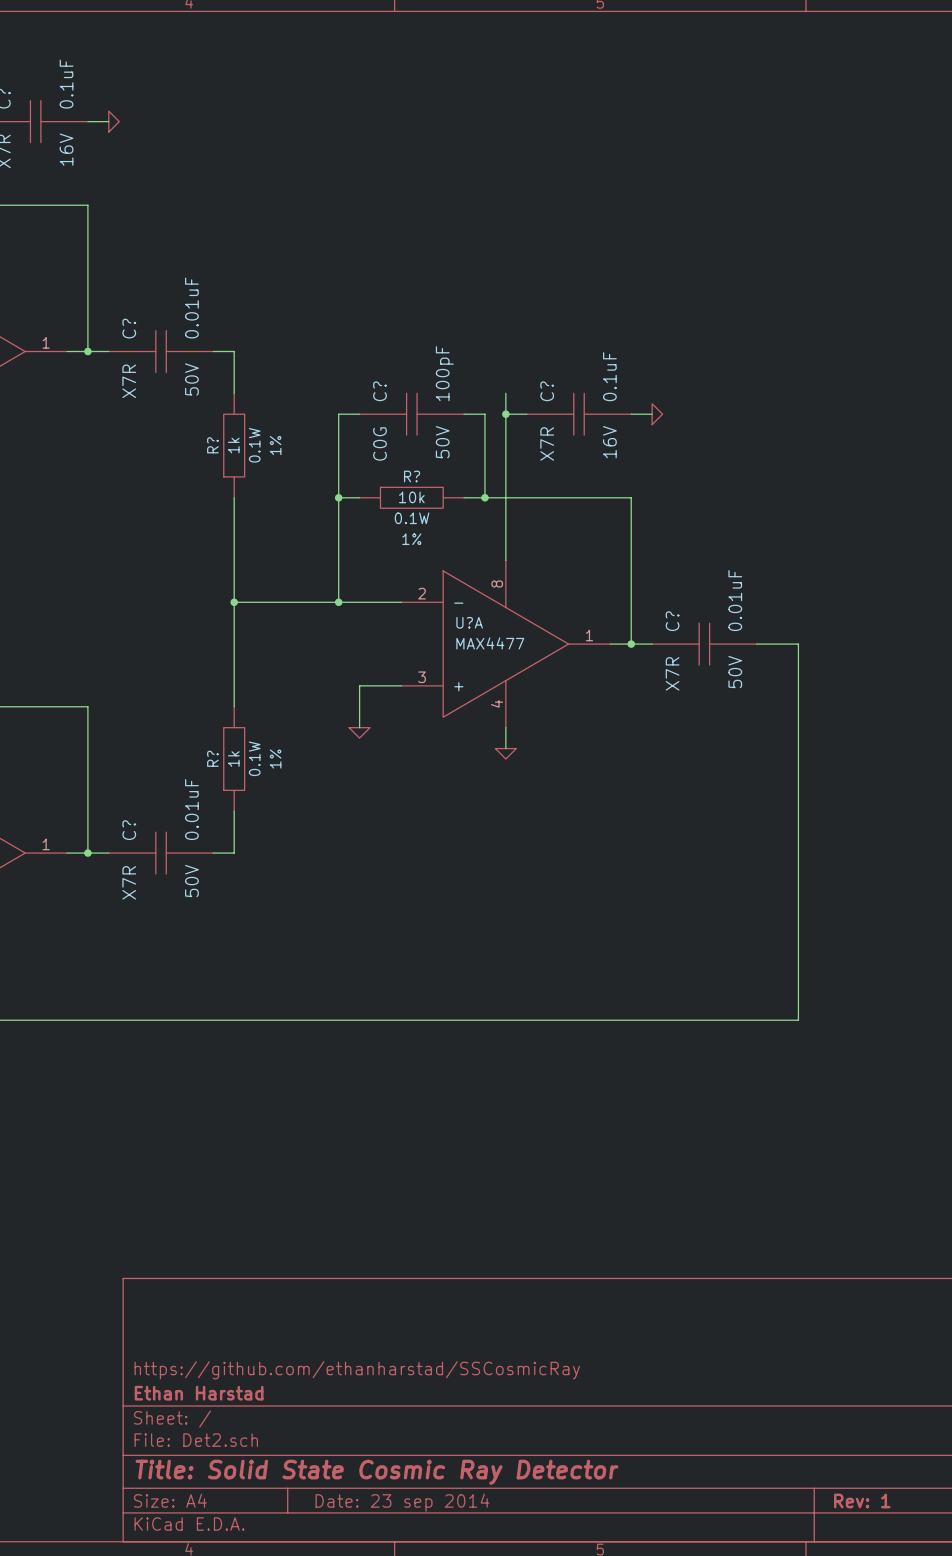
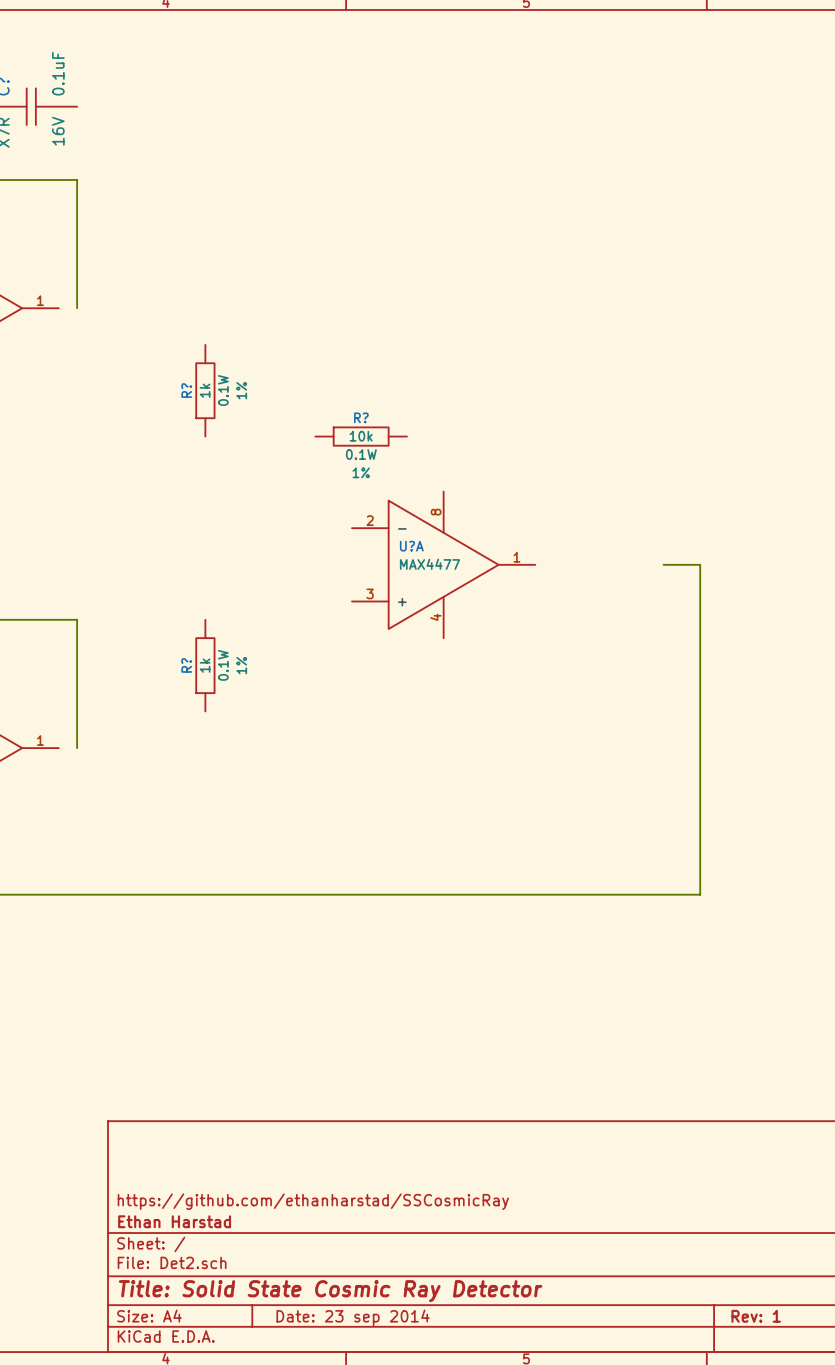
wire: (87, 121) (108, 121) -> none
power symbol: (114, 121) -> none
wire: (67, 351) (108, 351) -> none
junction: (87, 351) -> none
C?: 0.01uF (161, 351) -> none
wire: (213, 351) (234, 351) (234, 393) -> none
wire: (505, 393) (505, 560) -> none
wire: (359, 414) (338, 414) (338, 602) -> none
C?: 100pF (411, 414) -> none
wire: (464, 414) (484, 414) (484, 497) -> none
wire: (505, 414) (526, 414) -> none
junction: (505, 414) -> none
C?: 0.1uF (579, 414) -> none
wire: (631, 414) (652, 414) -> none
power symbol: (657, 414) -> none
wire: (234, 497) (234, 706) -> none
wire: (338, 497) (359, 497) -> none
junction: (338, 497) -> none
wire: (464, 497) (631, 497) (631, 644) -> none
junction: (484, 497) -> none
wire: (234, 602) (401, 602) -> none
junction: (234, 602) -> none
junction: (338, 602) -> none
wire: (610, 644) (652, 644) -> none
junction: (631, 644) -> none
C?: 0.01uF (704, 644) -> none
wire: (401, 685) (359, 685) (359, 727) -> none
wire: (505, 727) (505, 748) -> none
power symbol: (359, 732) -> none
power symbol: (505, 753) -> none
wire: (234, 811) (234, 853) (213, 853) -> none
wire: (67, 853) (108, 853) -> none
junction: (87, 853) -> none
C?: 0.01uF (161, 853) -> none

